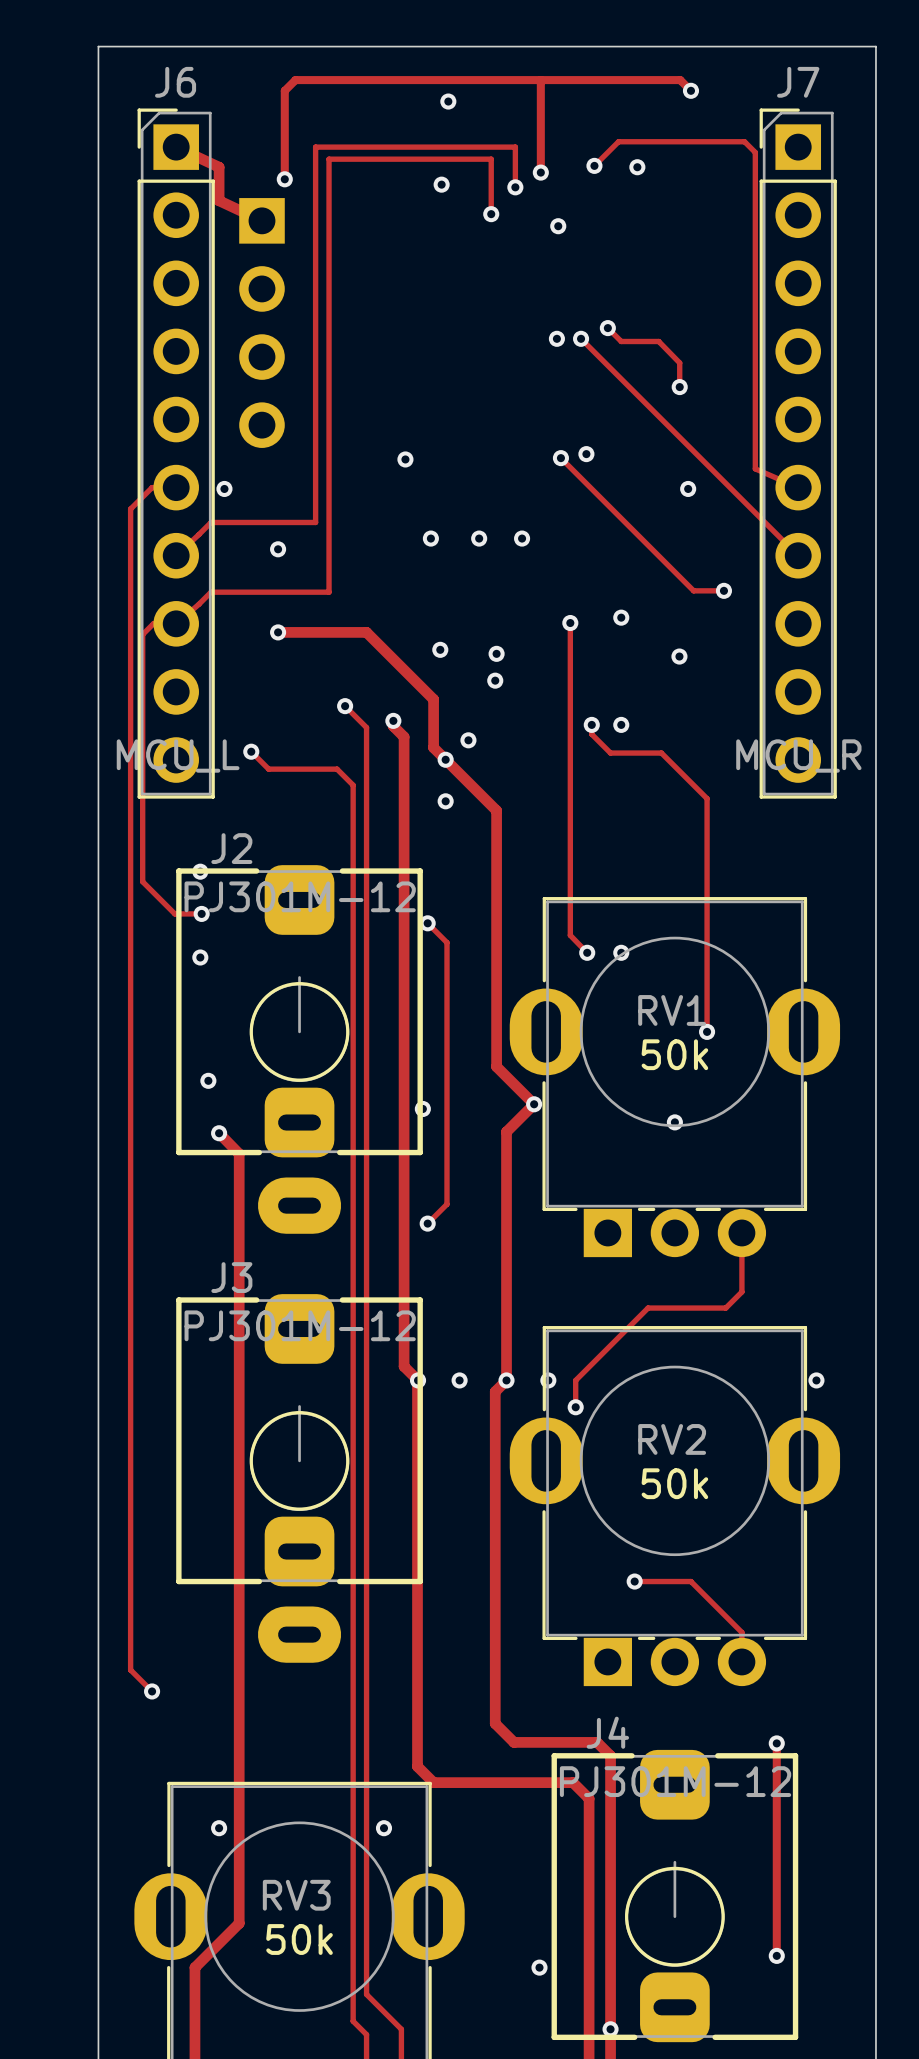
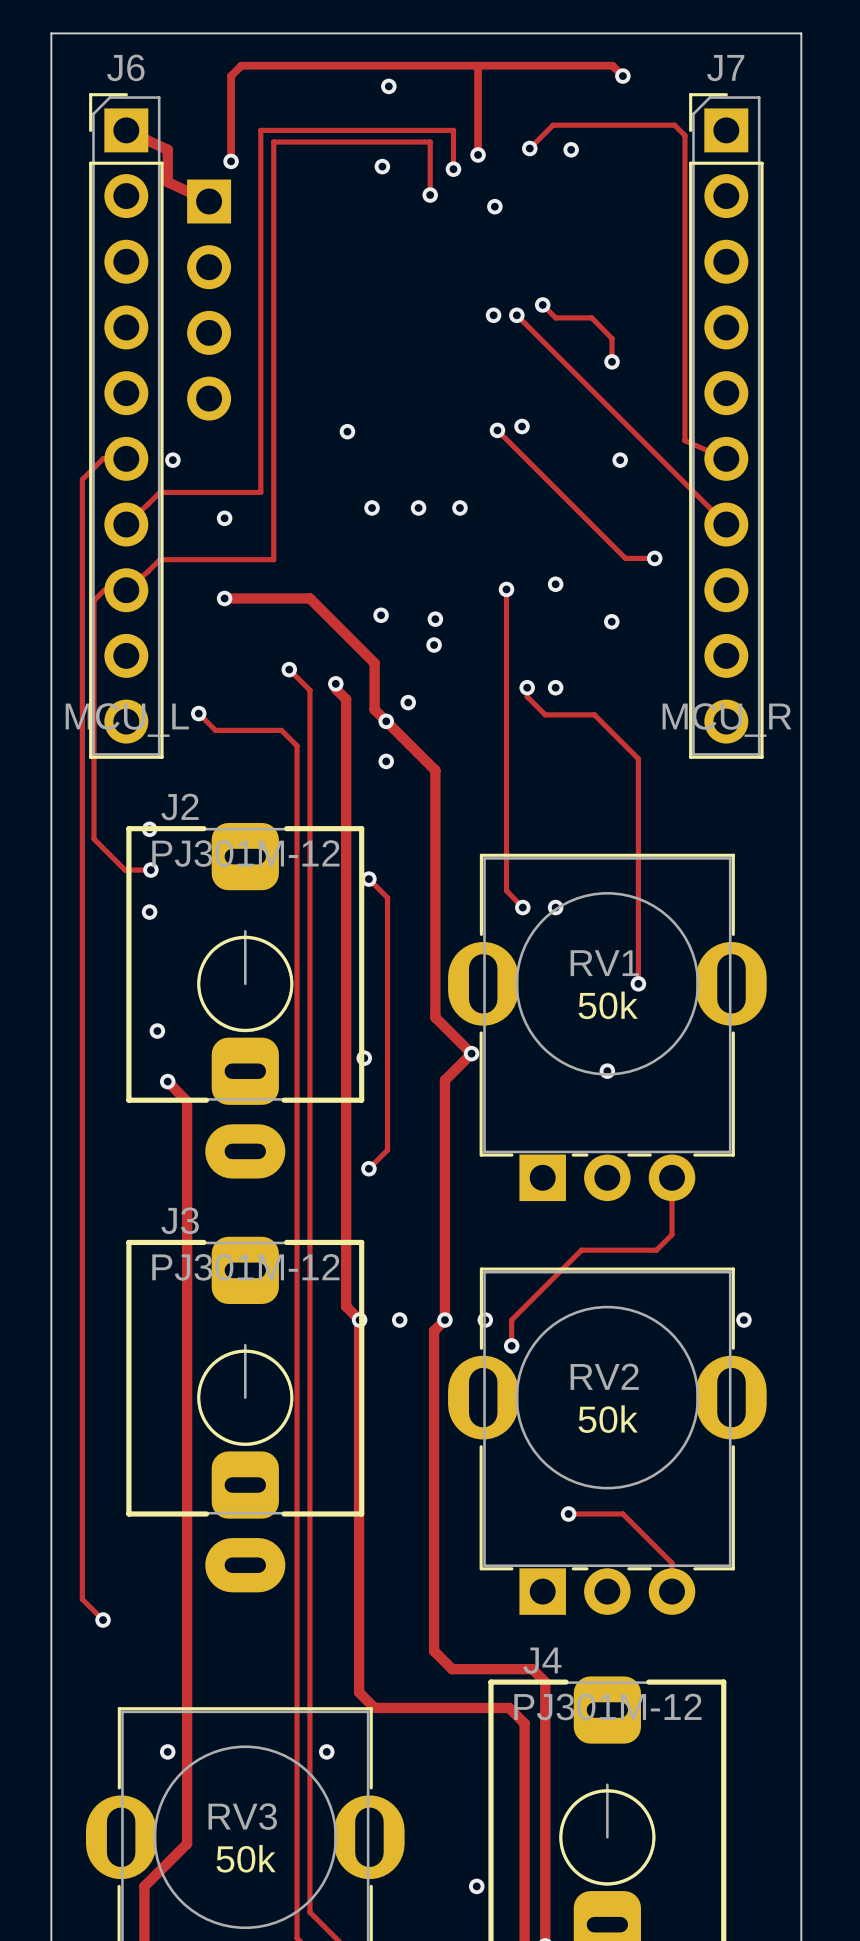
track: (776, 1743) (776, 1955) -> none
via: (776, 1743) -> none
via: (776, 1955) -> none

